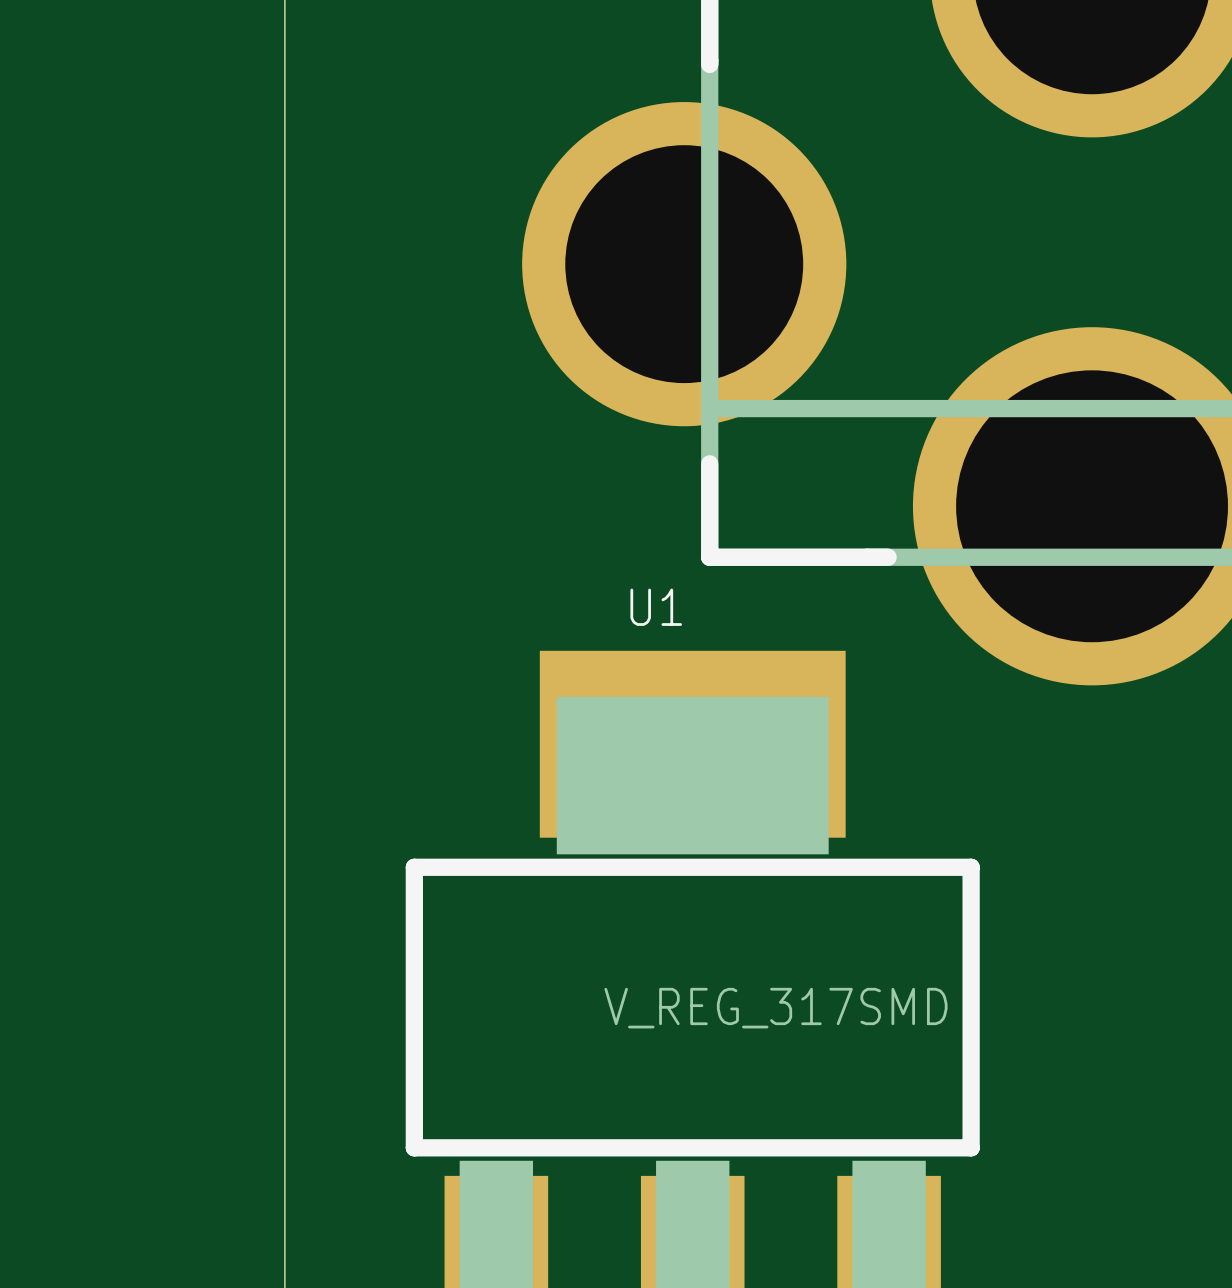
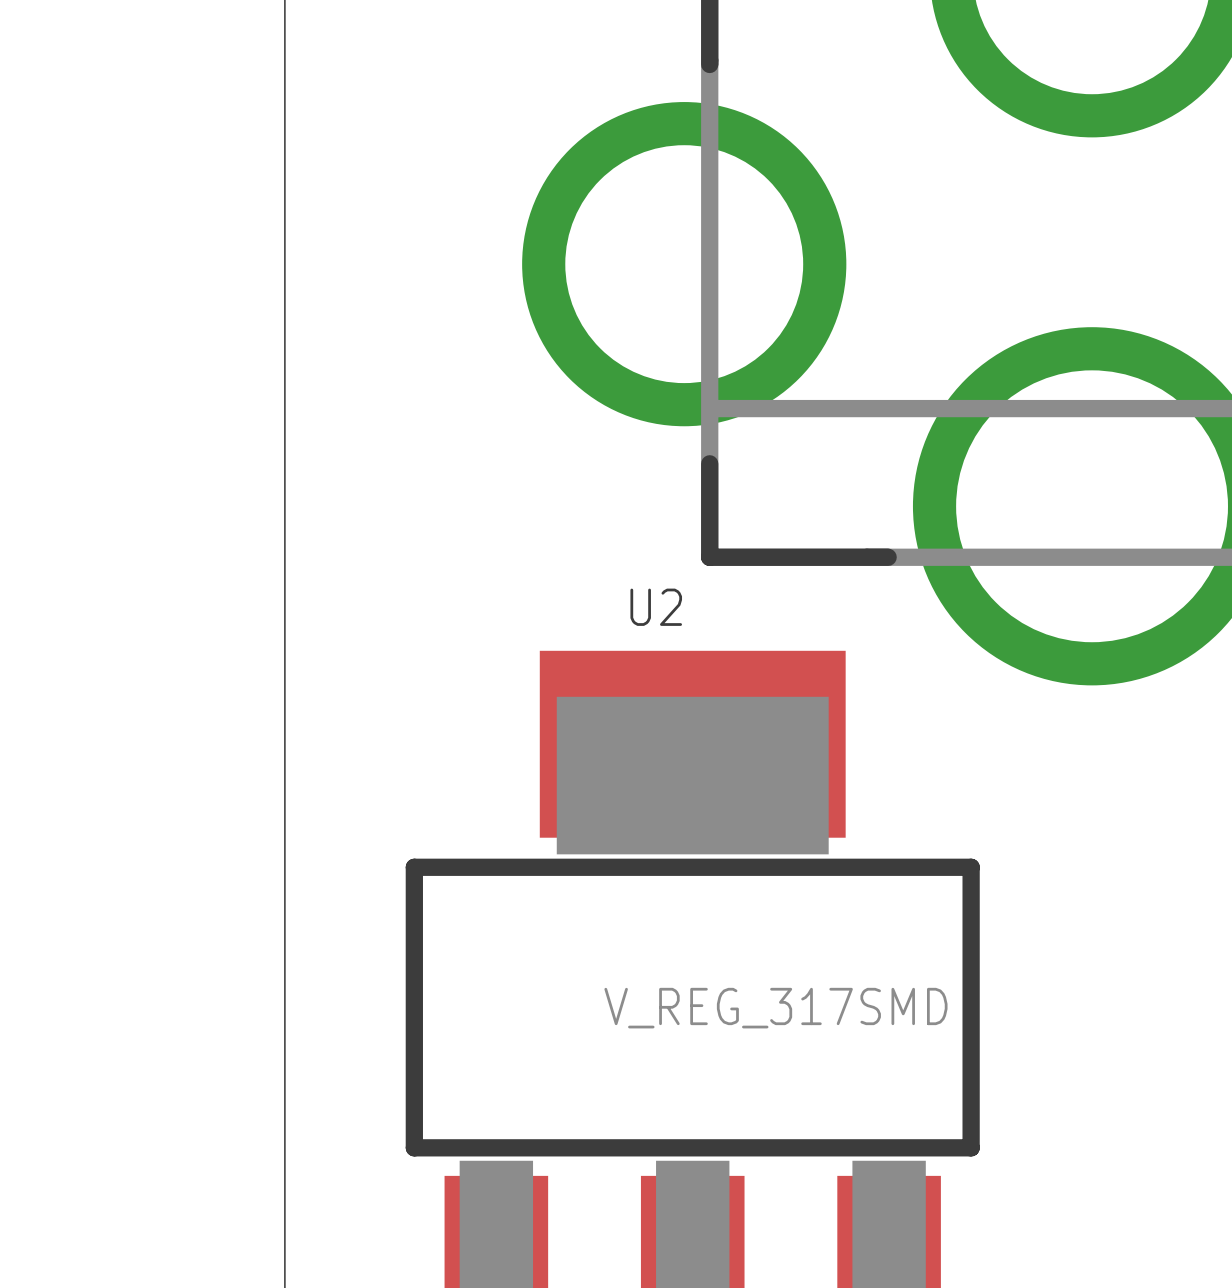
U1 name: U1 (656, 607) -> U2 (656, 607)

